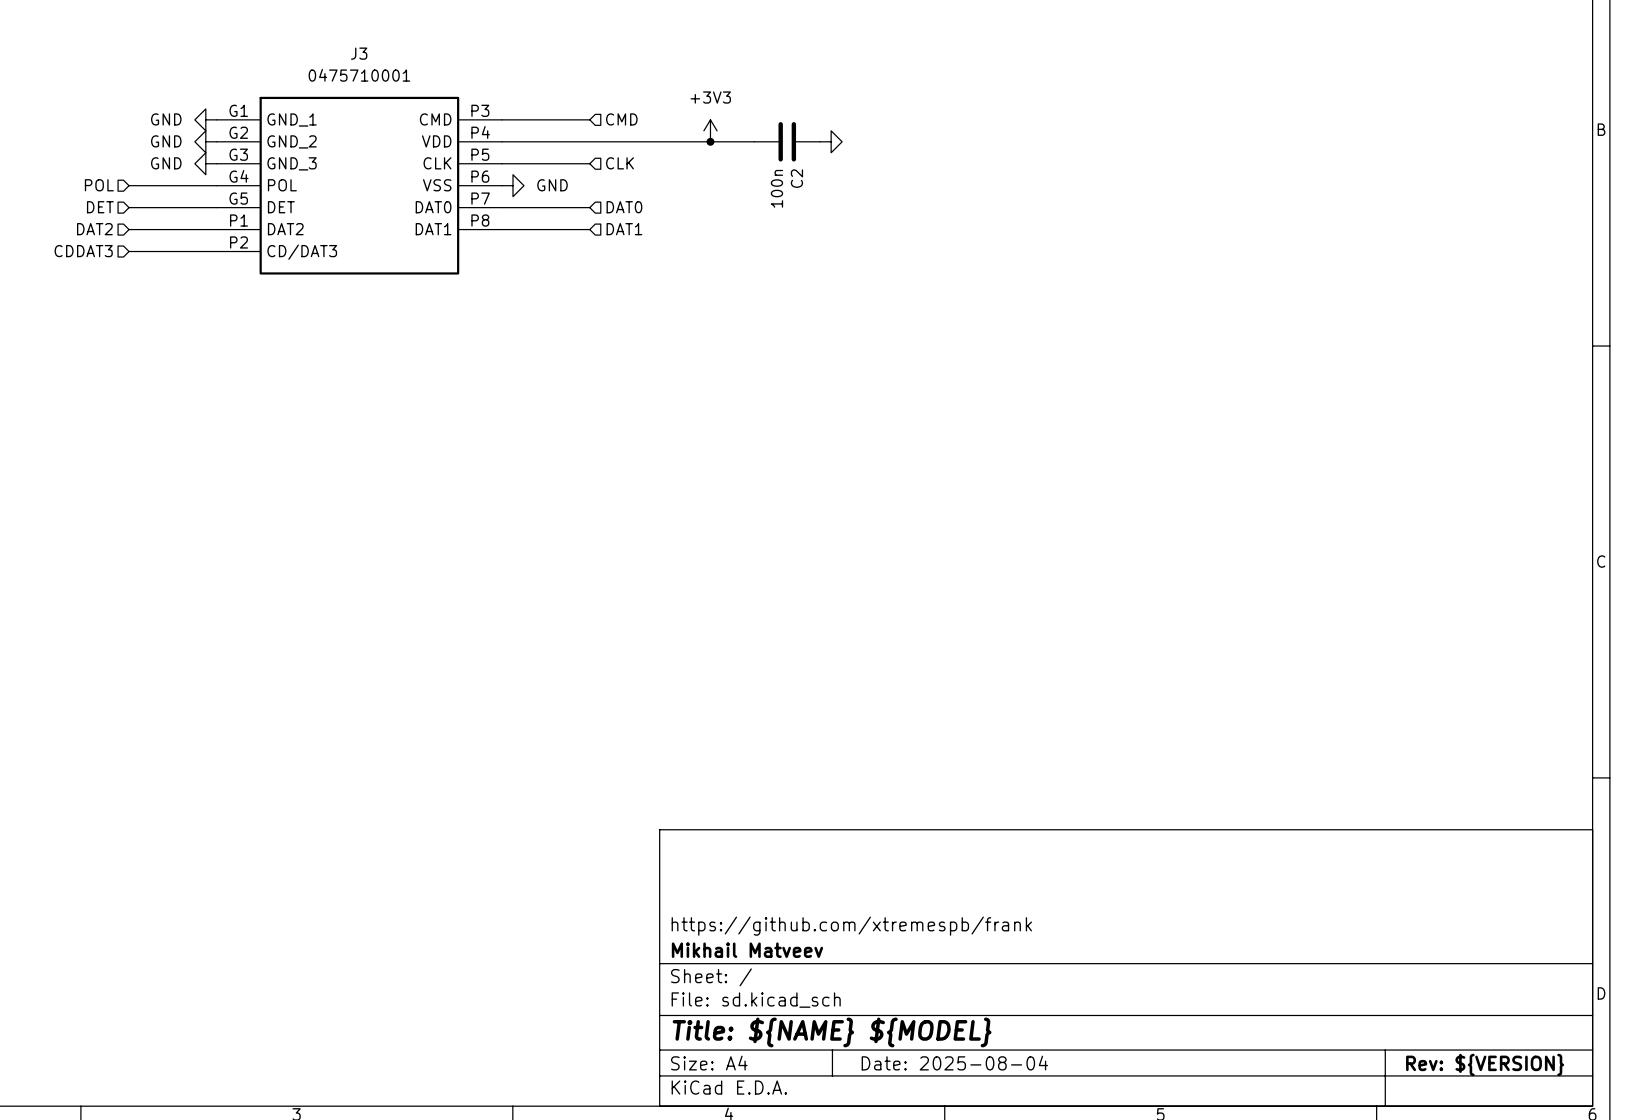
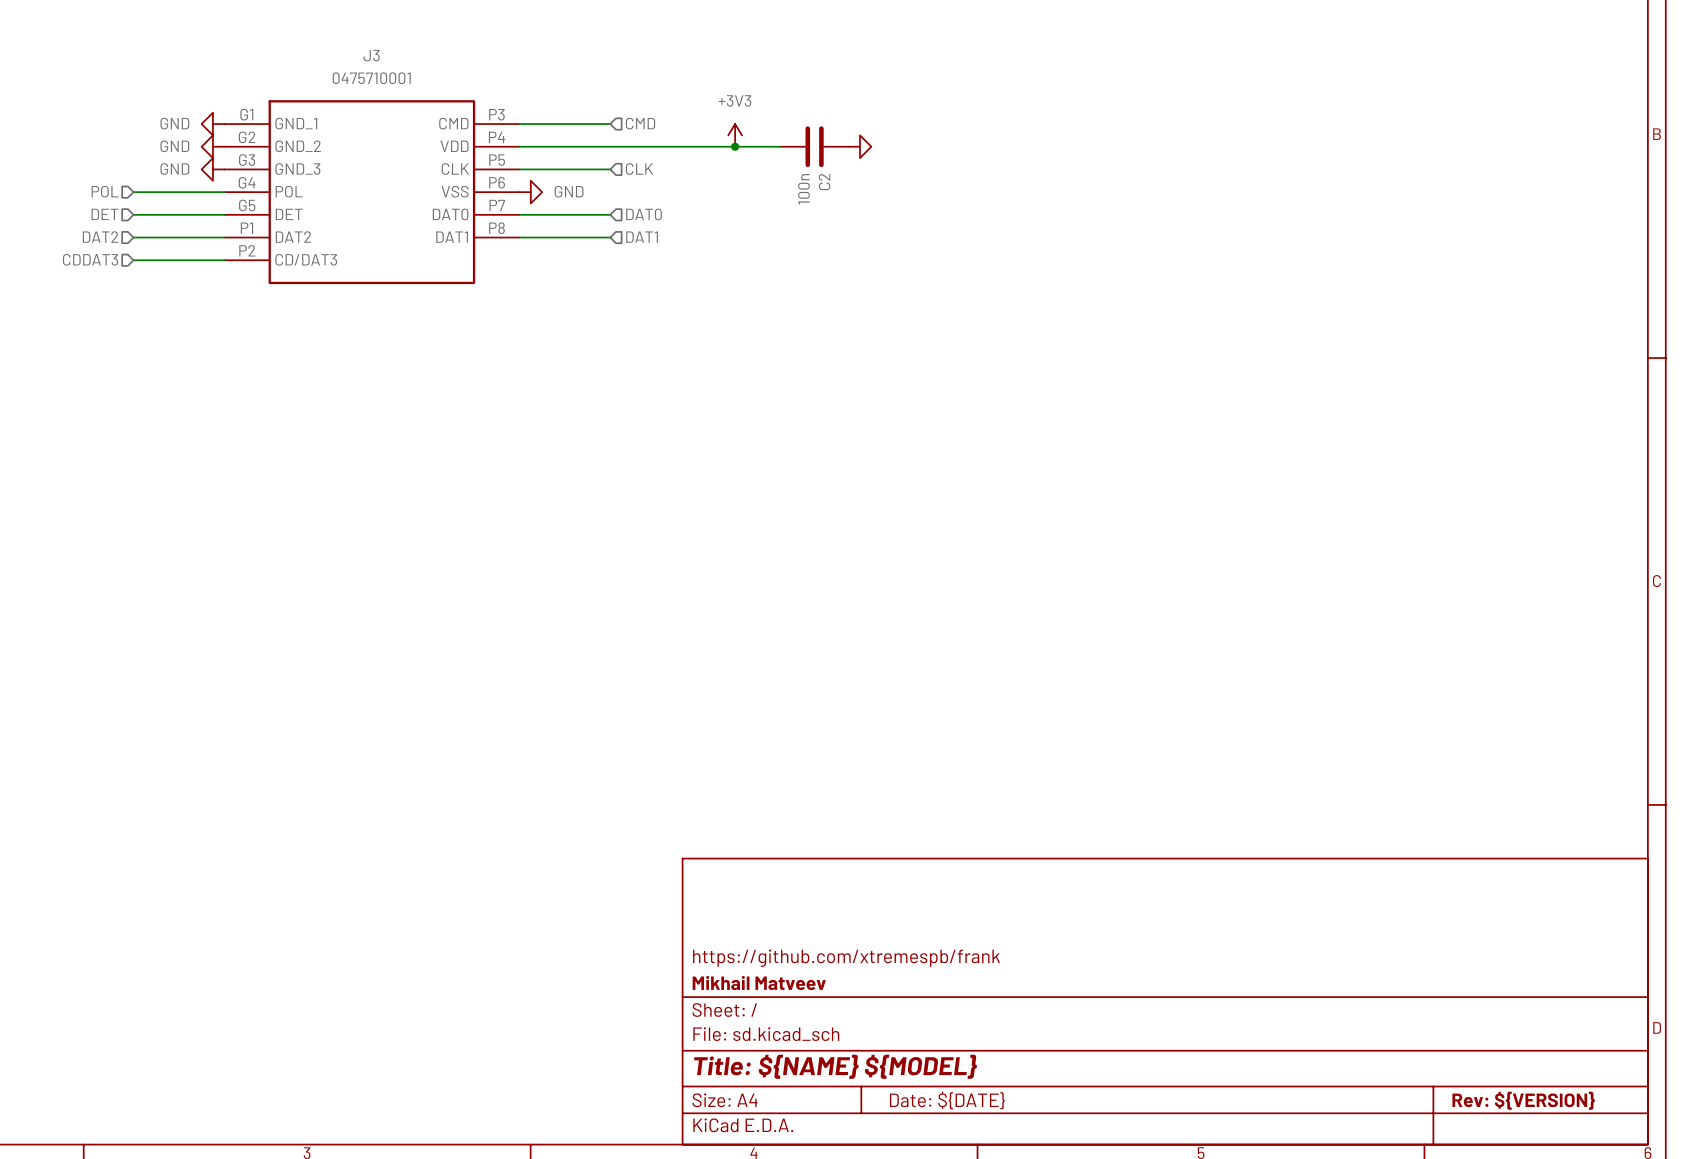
title block: Date: 2025-08-04 (954, 1063) -> Date: ${DATE} (947, 1100)

